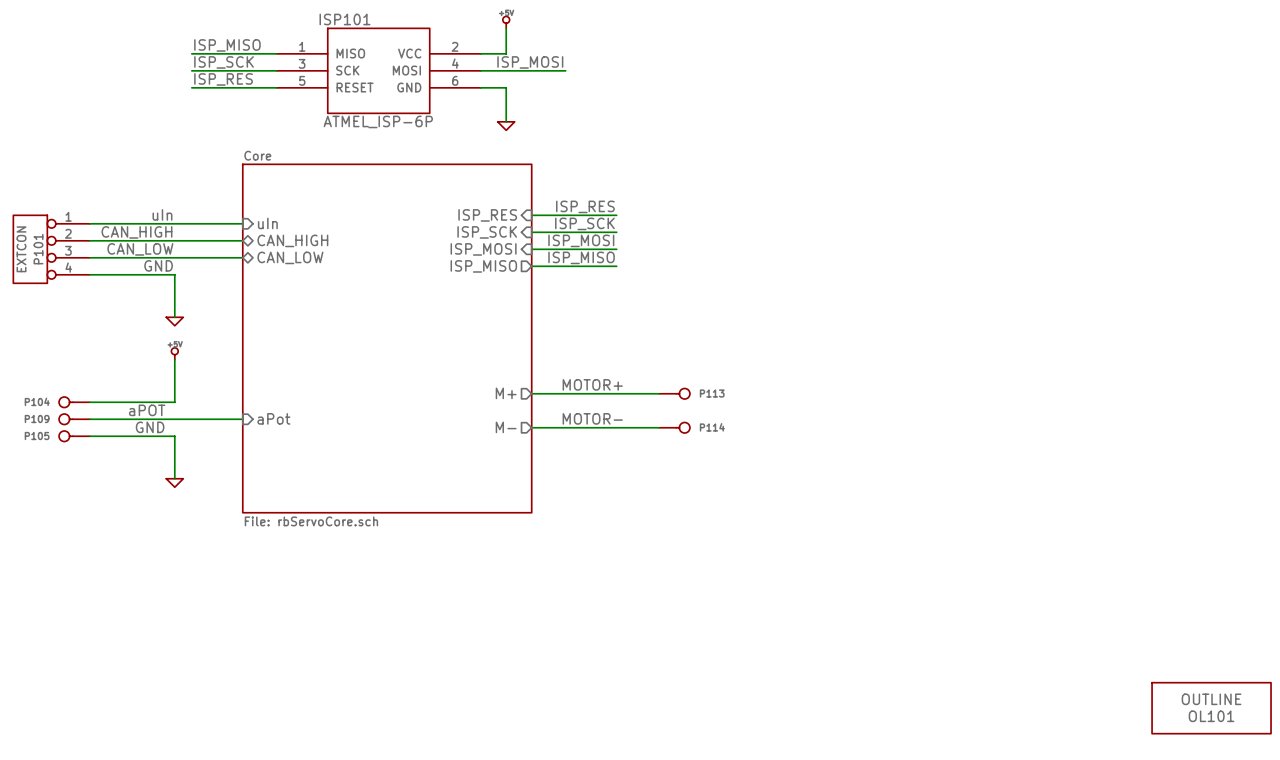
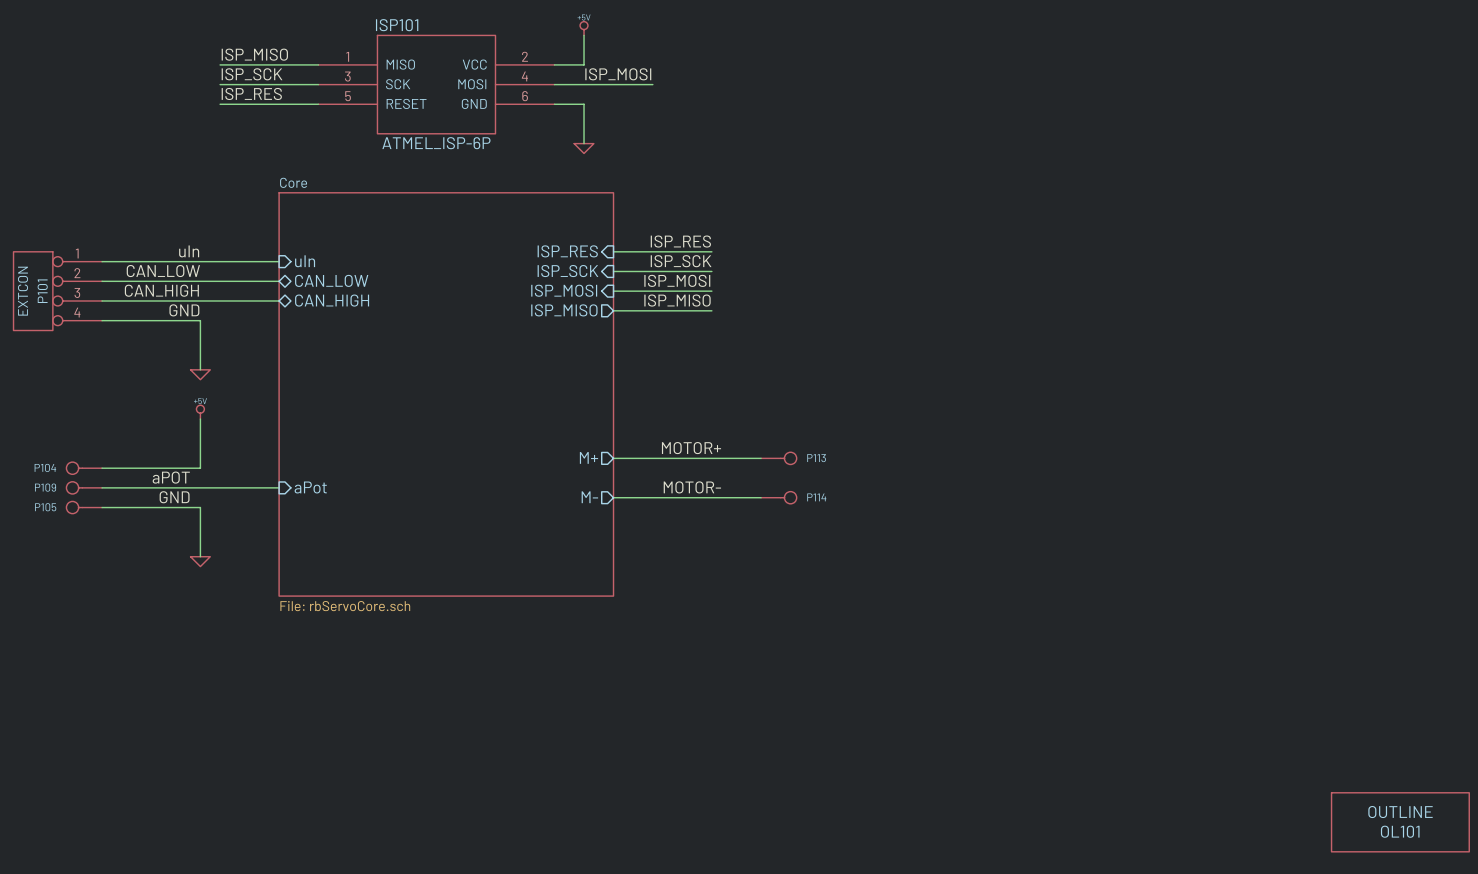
label: CAN_HIGH (136, 232) -> CAN_LOW (163, 271)
sheet pin: CAN_HIGH (292, 240) -> CAN_LOW (331, 280)
label: CAN_LOW (140, 249) -> CAN_HIGH (161, 290)
sheet pin: CAN_LOW (290, 257) -> CAN_HIGH (332, 300)

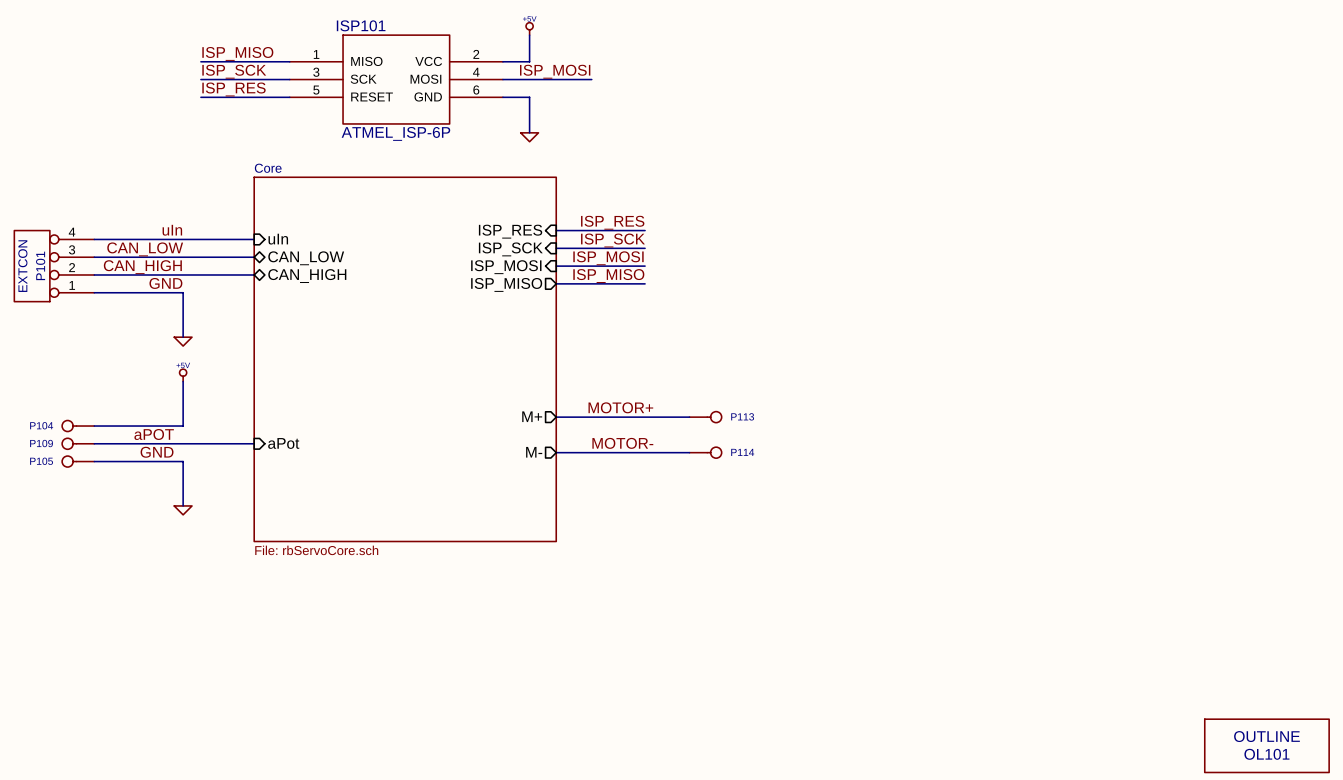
P101 flip: as is (33, 291) -> up-down (32, 266)

